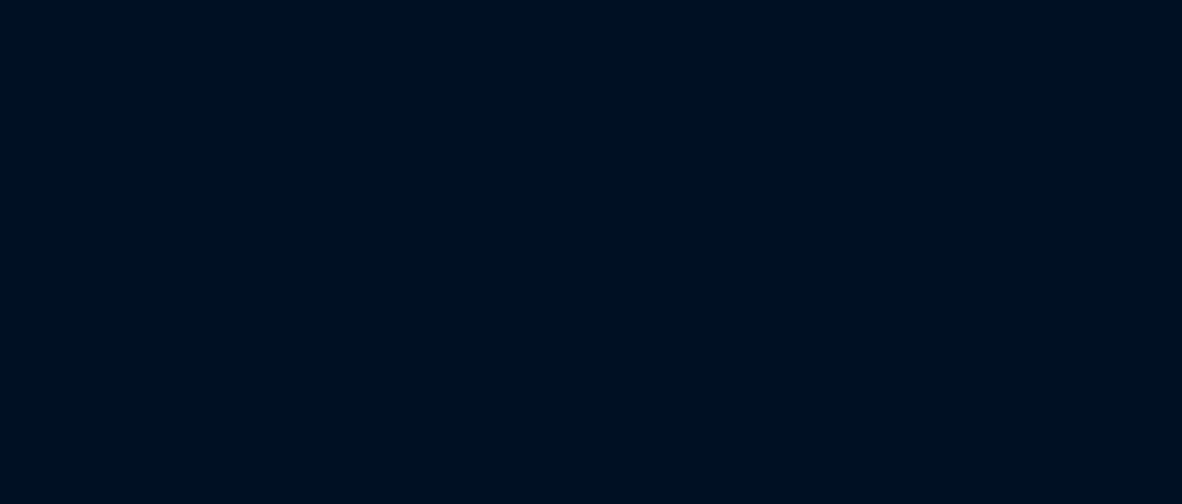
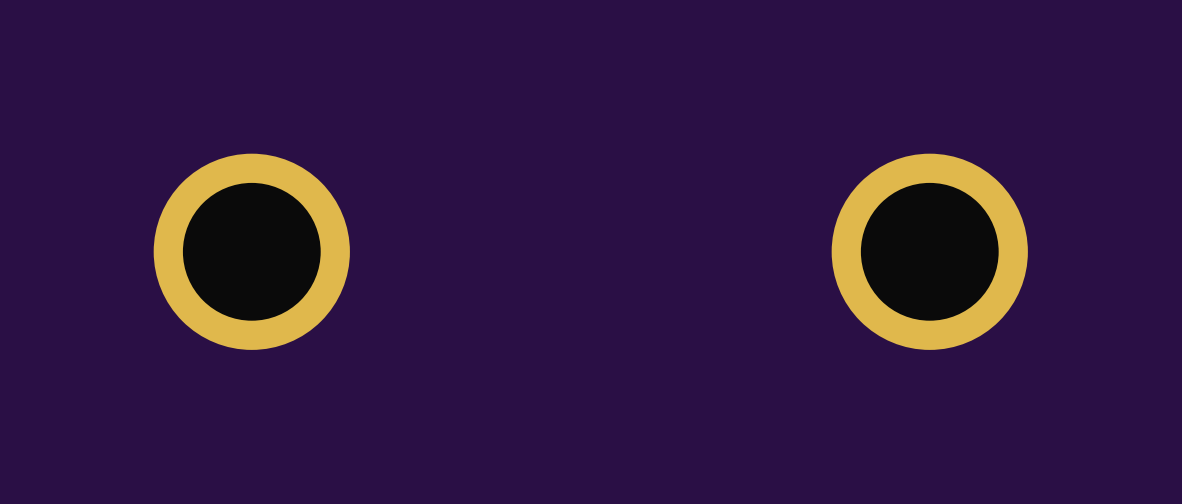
part: none -> (251, 251)
part: none -> (929, 251)

